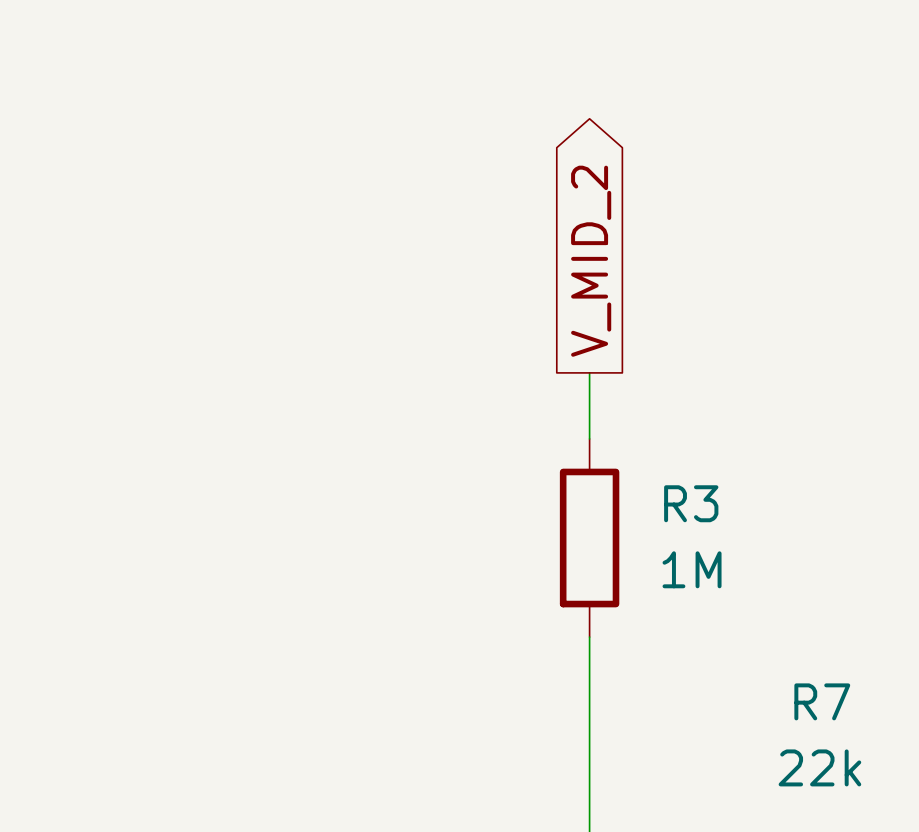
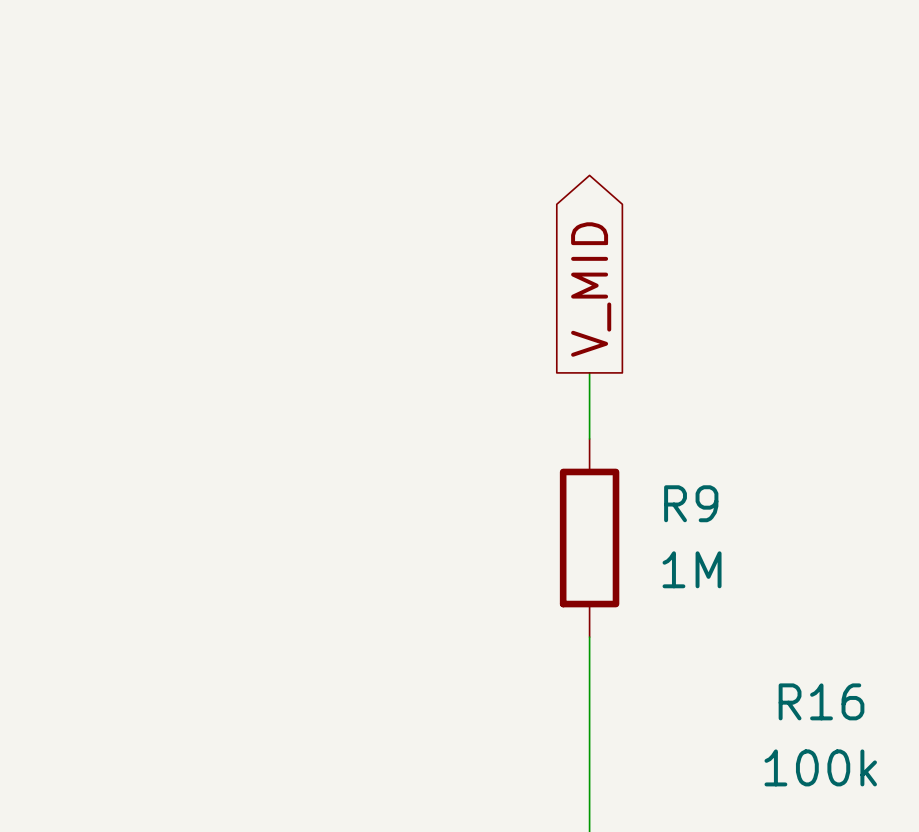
global label: V_MID_2 (591, 261) -> V_MID (591, 289)
R3 name: R3 (691, 503) -> R9 (691, 503)
R7 name: R7 (822, 701) -> R16 (821, 701)
R7 value: 22k (819, 767) -> 100k (820, 767)

